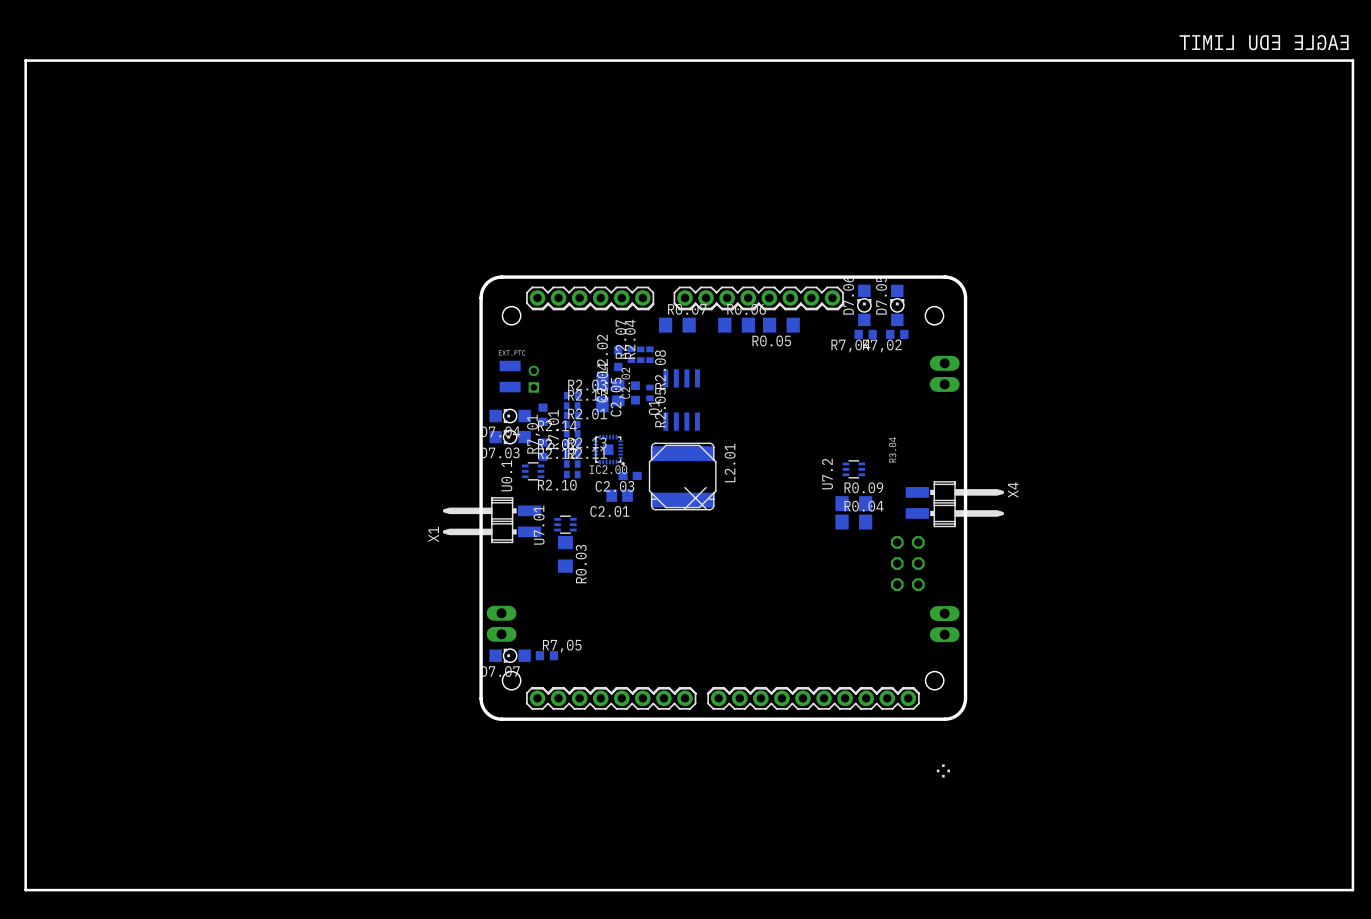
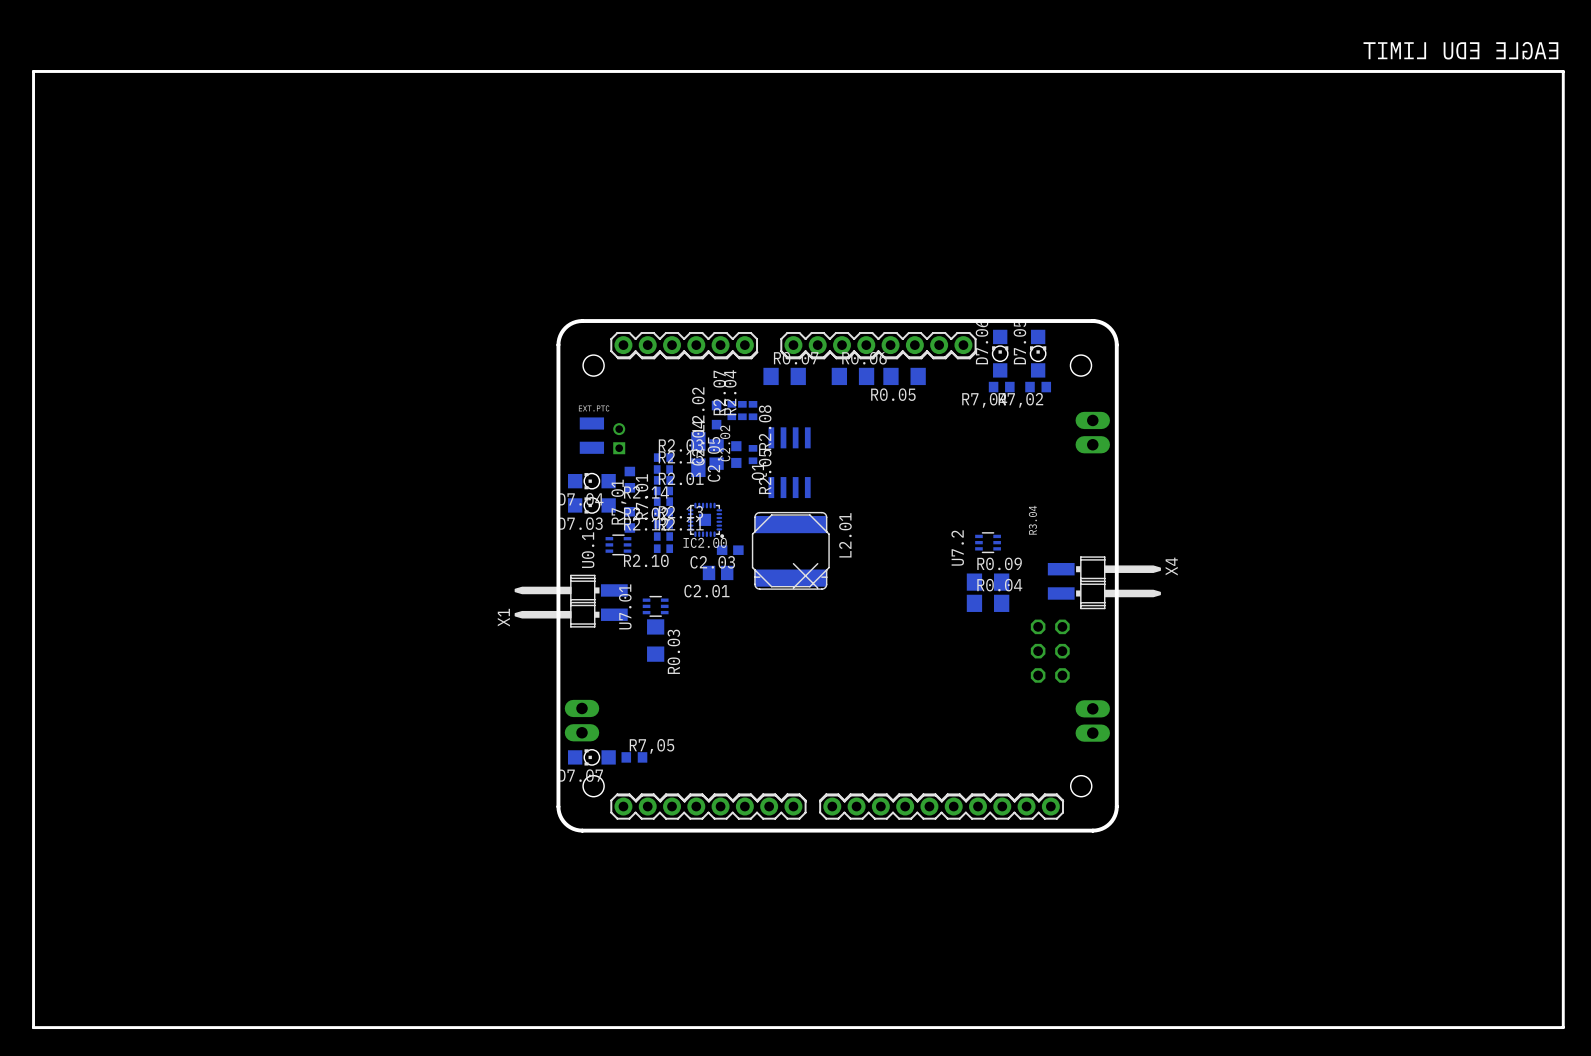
drawing: [936, 764, 950, 778] -> none

